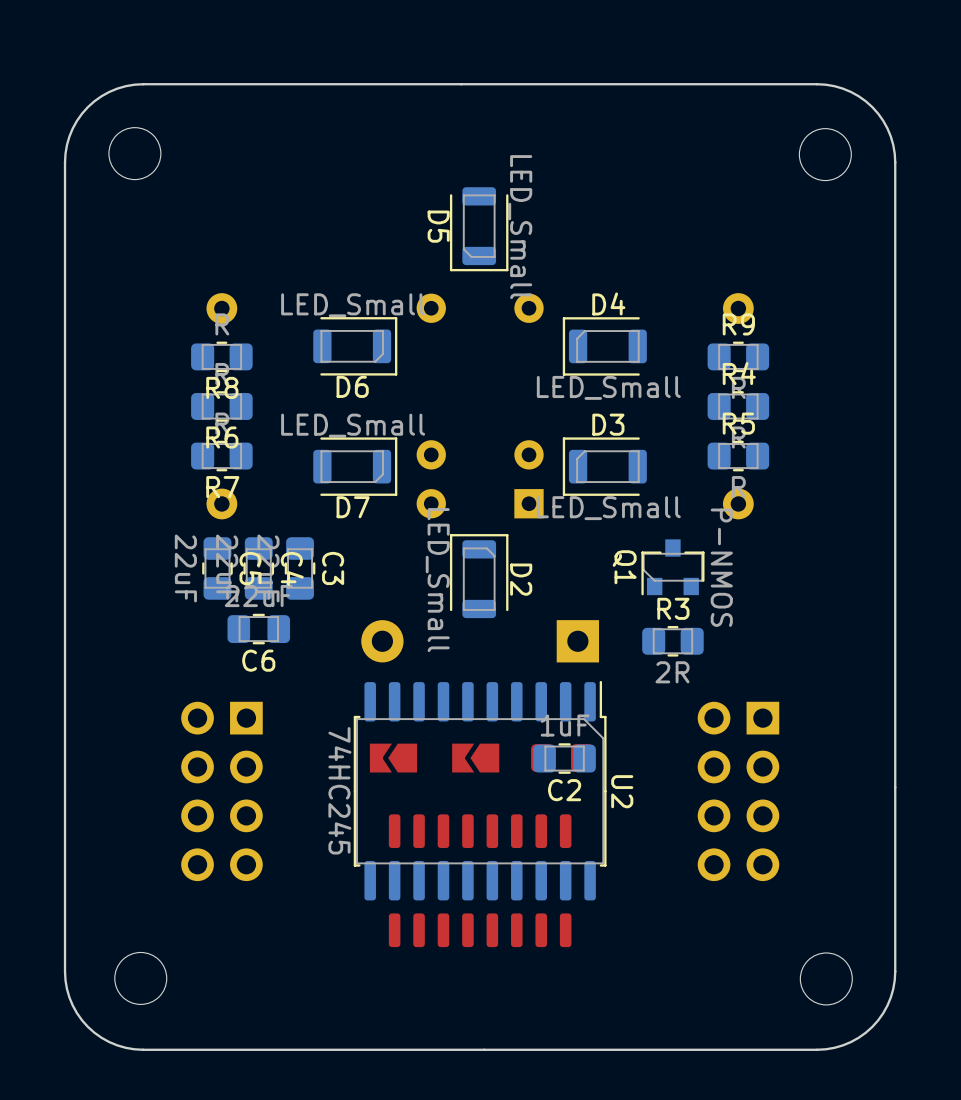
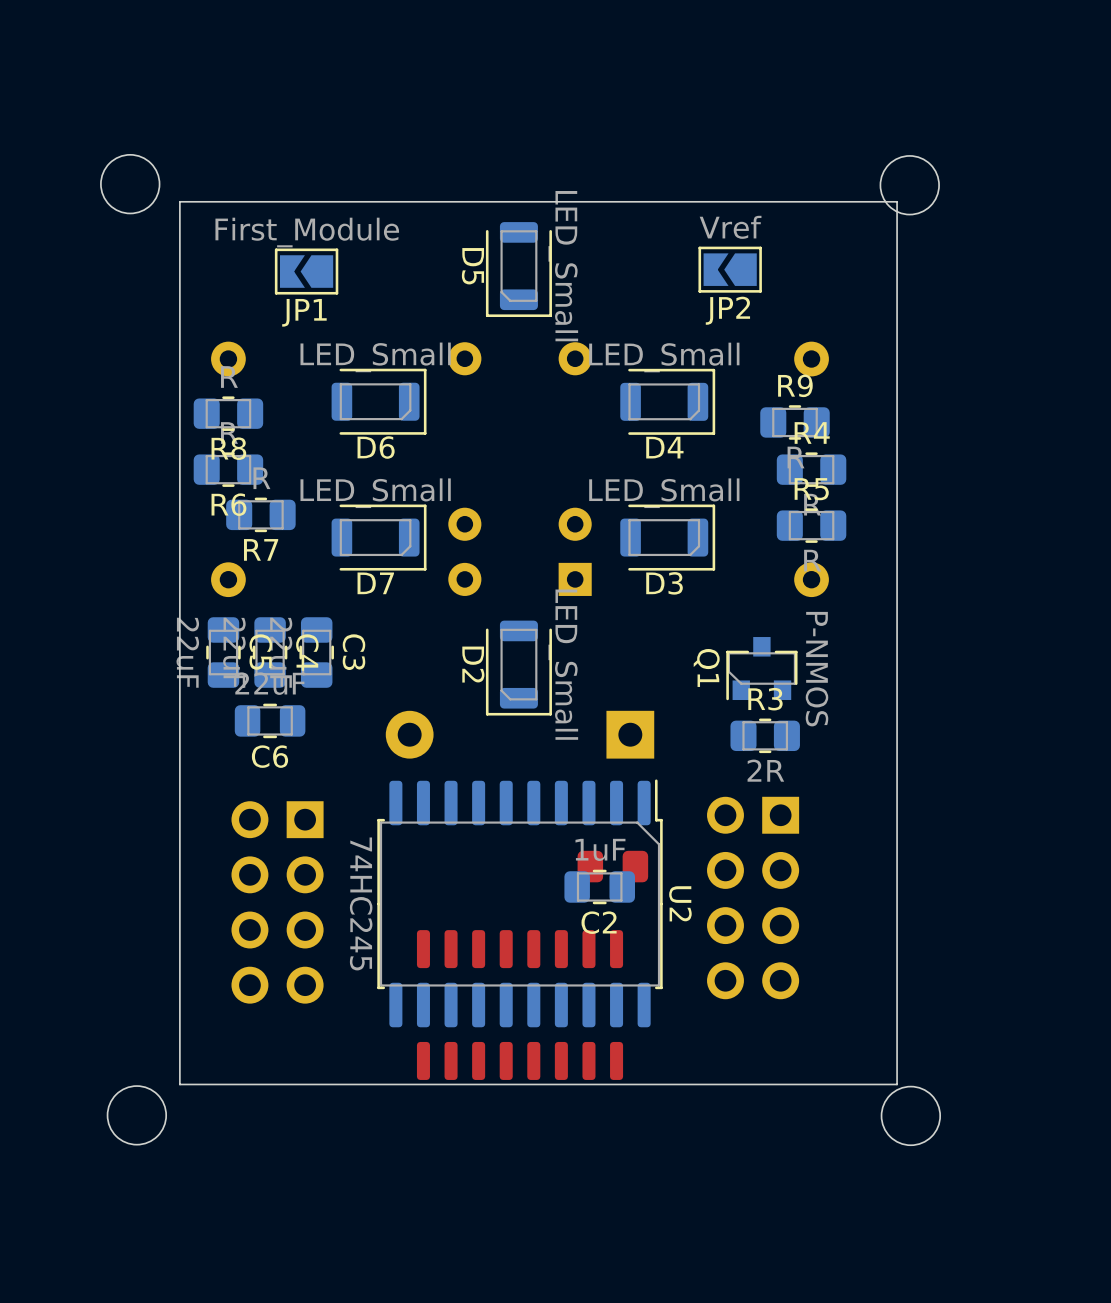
board edge: (817, 84) (143, 84) (125, 86) (109, 91) (94, 101) (82, 113) (69, 136) (65, 162) (65, 971) (66, 989) (72, 1005) (82, 1020) (94, 1032) (117, 1045) (143, 1049) (817, 1049) (834, 1047) (850, 1042) (865, 1032) (878, 1020) (890, 997) (895, 971) (894, 153) (887, 128) (872, 107) (850, 91) (834, 86) (817, 84) -> (897, 201) (897, 1084) (179, 1084) (179, 201) (897, 201)
JP2: none -> Vref (730, 269)
JP1: none -> First_Module (306, 271)
D4 rotation: 0° (604, 346) -> 180° (667, 401)
R9 position: (738, 356) -> (795, 422)
R7 position: (221, 456) -> (260, 514)
D3 rotation: 0° (604, 466) -> 180° (667, 537)
Q1 position: (672, 567) -> (761, 668)
D2 rotation: 0° (479, 576) -> 180° (518, 668)
R3 position: (672, 641) -> (765, 735)
part: (393, 758) -> none
part: (475, 758) -> none
C2 position: (564, 758) -> (599, 886)
part position: (221, 791) -> (277, 902)
part position: (738, 791) -> (753, 898)

